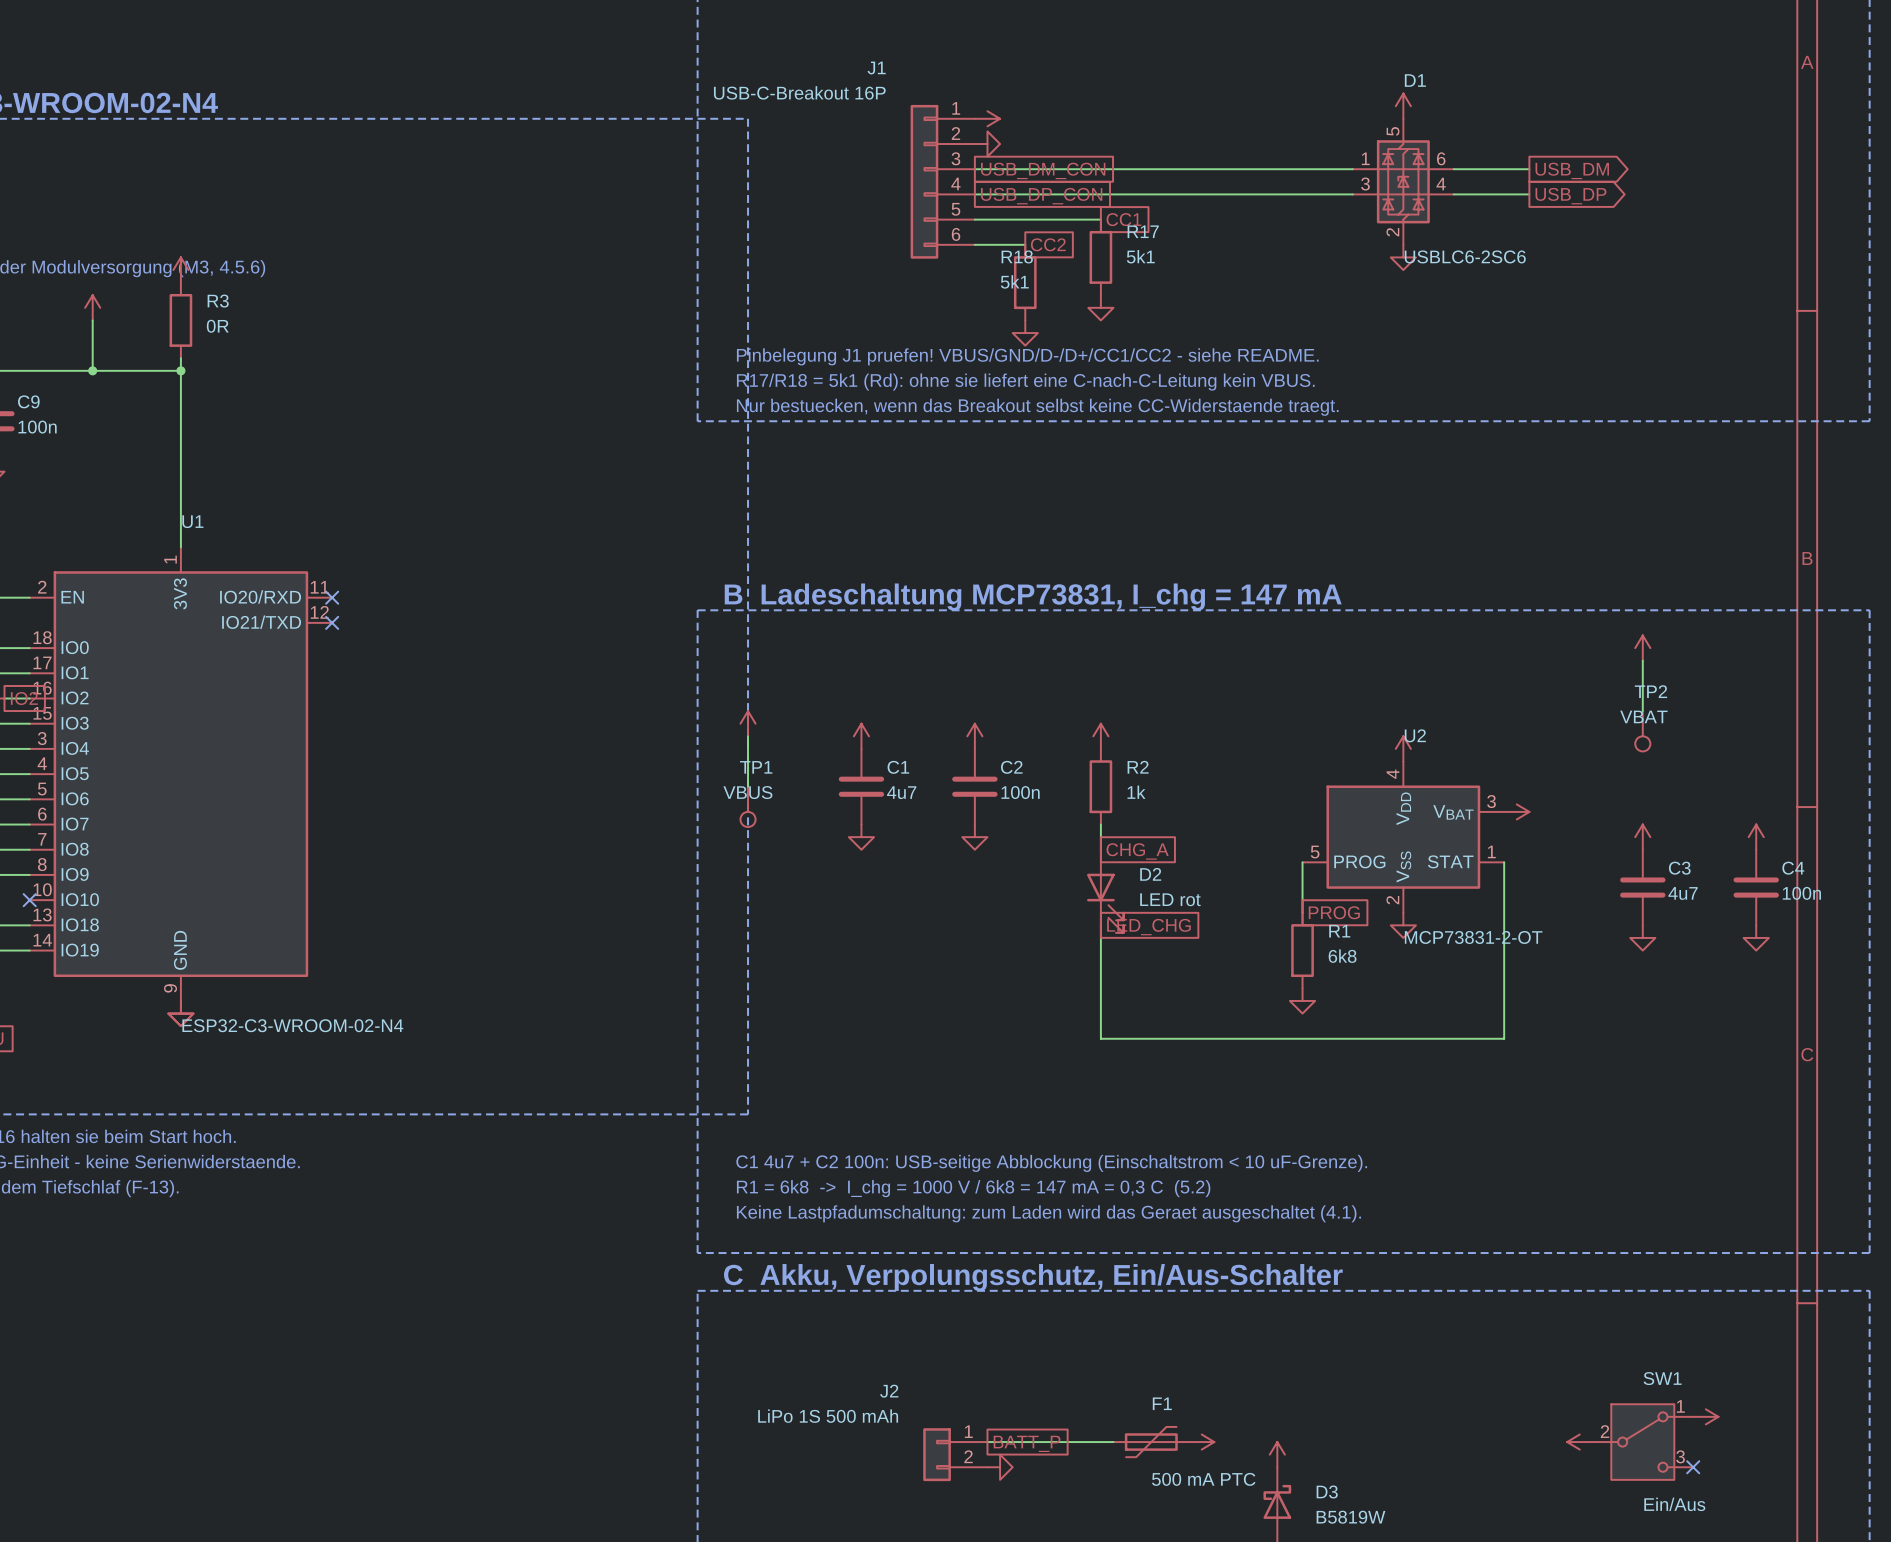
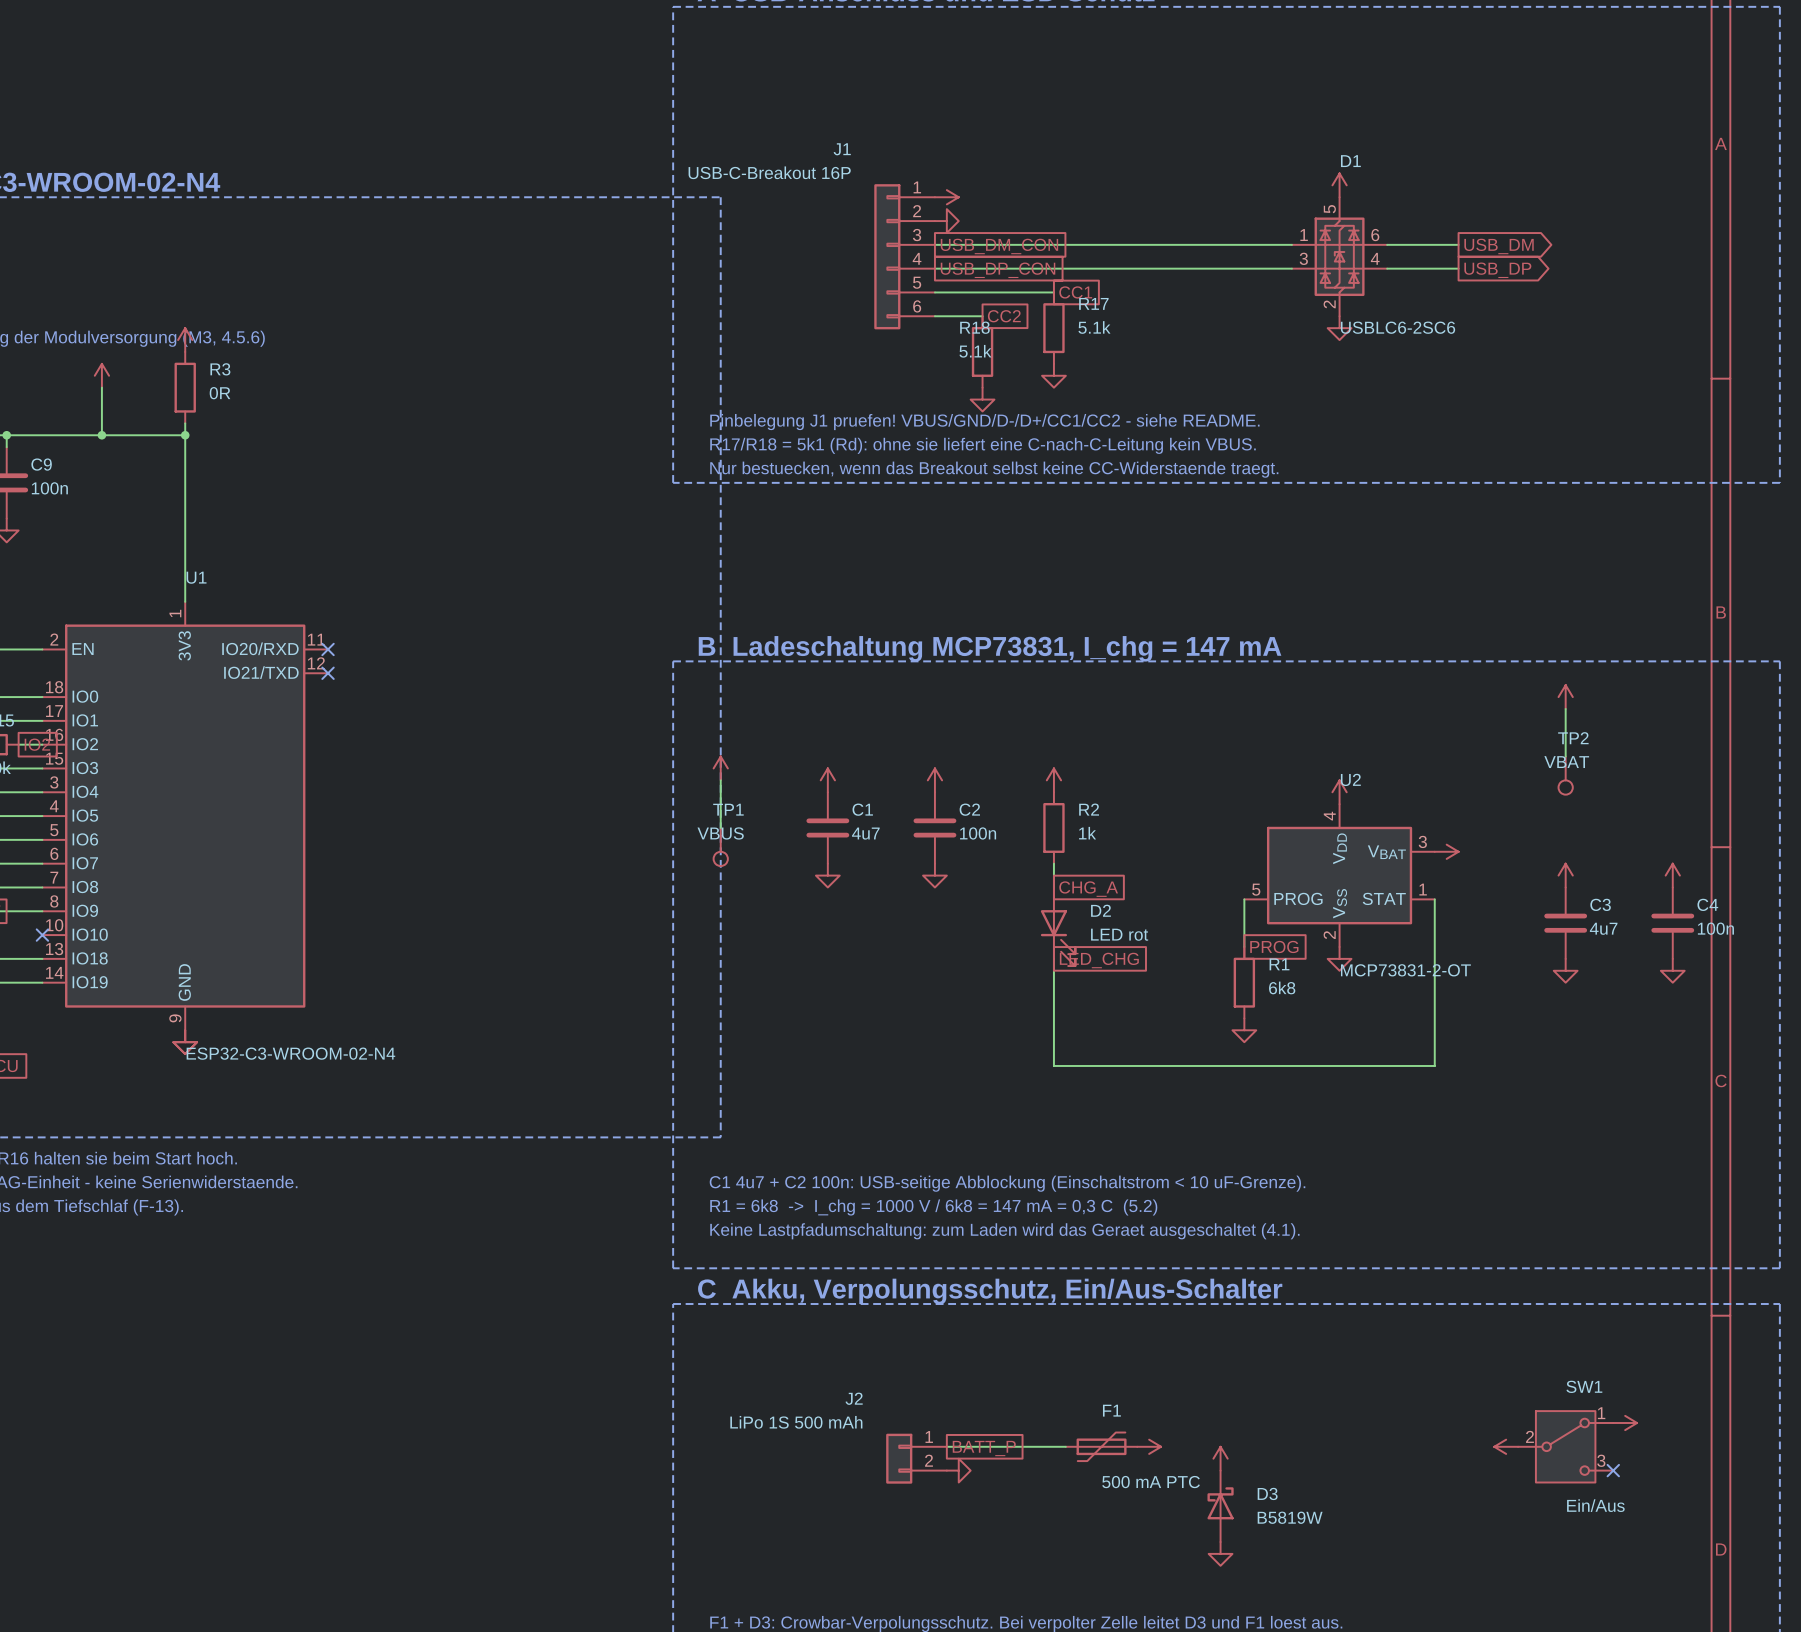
R17 value: 5k1 (1140, 256) -> 5.1k (1094, 327)
R18 value: 5k1 (1014, 281) -> 5.1k (975, 351)

